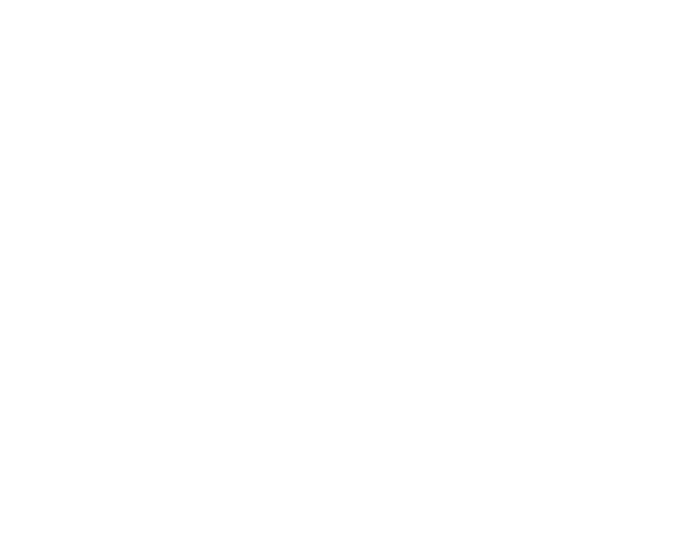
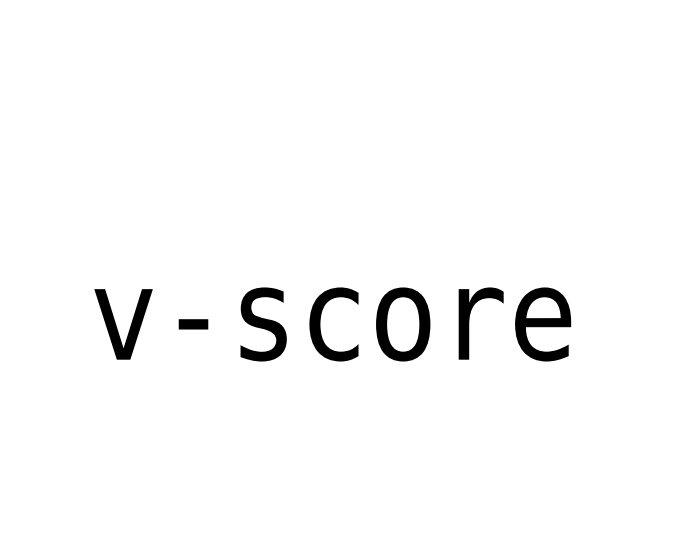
text: none -> v-score (332, 324)

